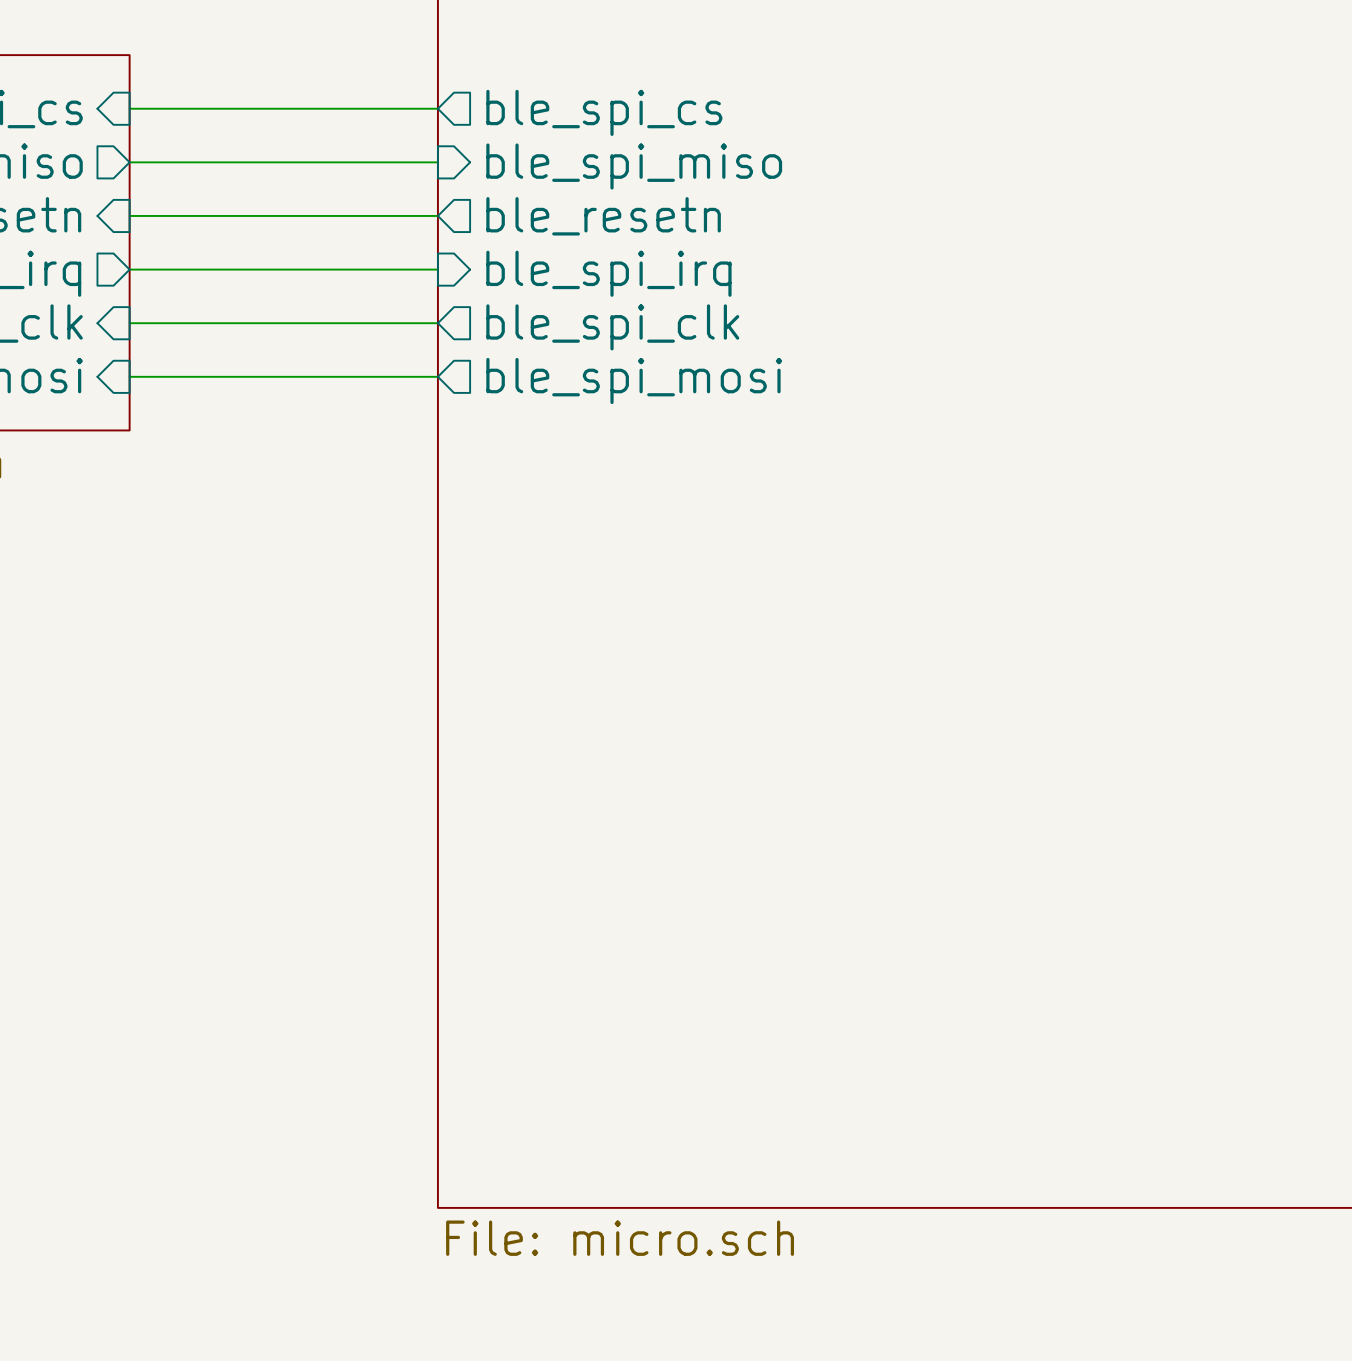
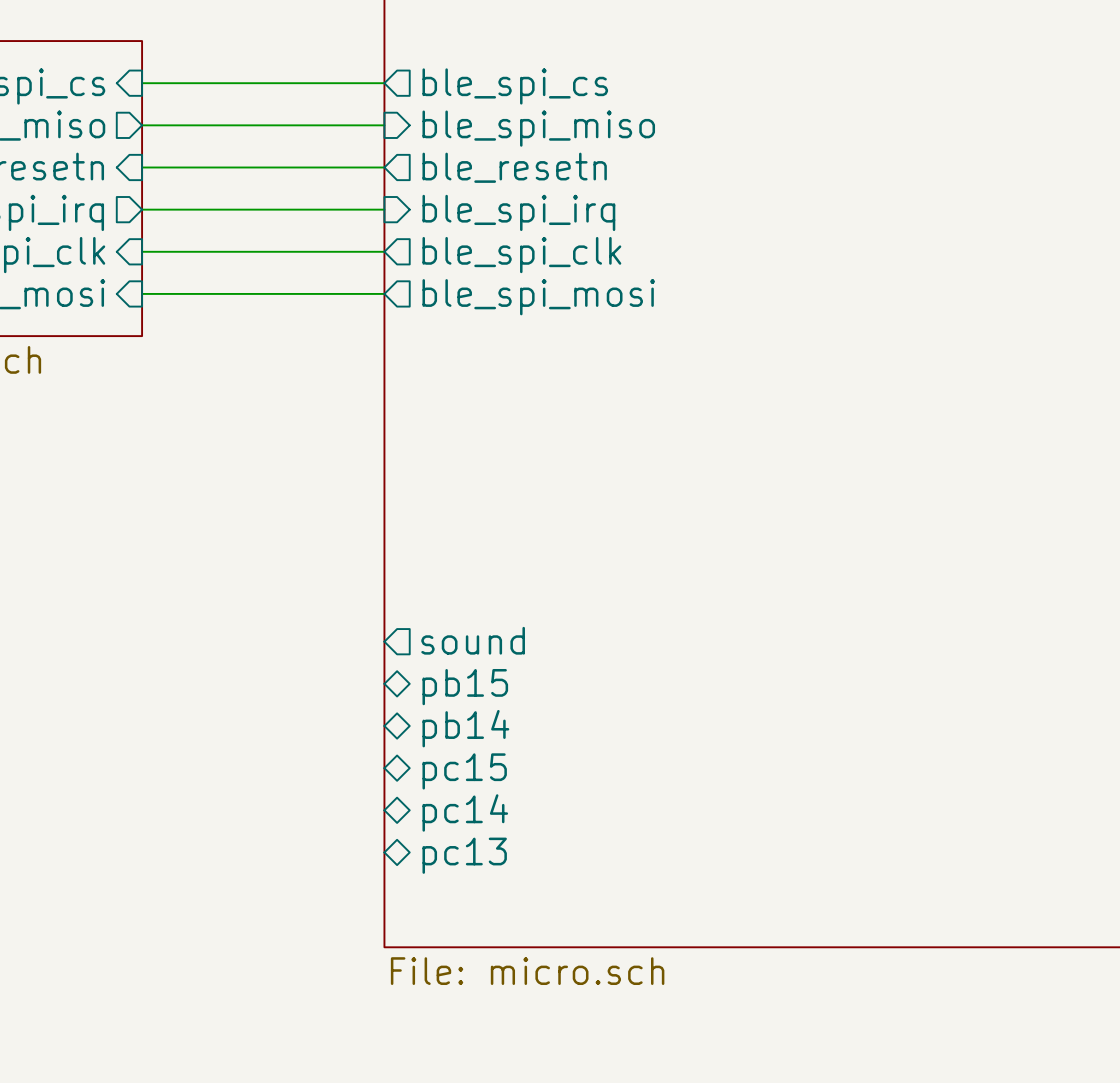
sheet pin: none -> sound (473, 640)
sheet pin: none -> pb15 (465, 687)
sheet pin: none -> pb14 (465, 728)
sheet pin: none -> pc15 (464, 771)
sheet pin: none -> pc14 (465, 812)
sheet pin: none -> pc13 (464, 855)

